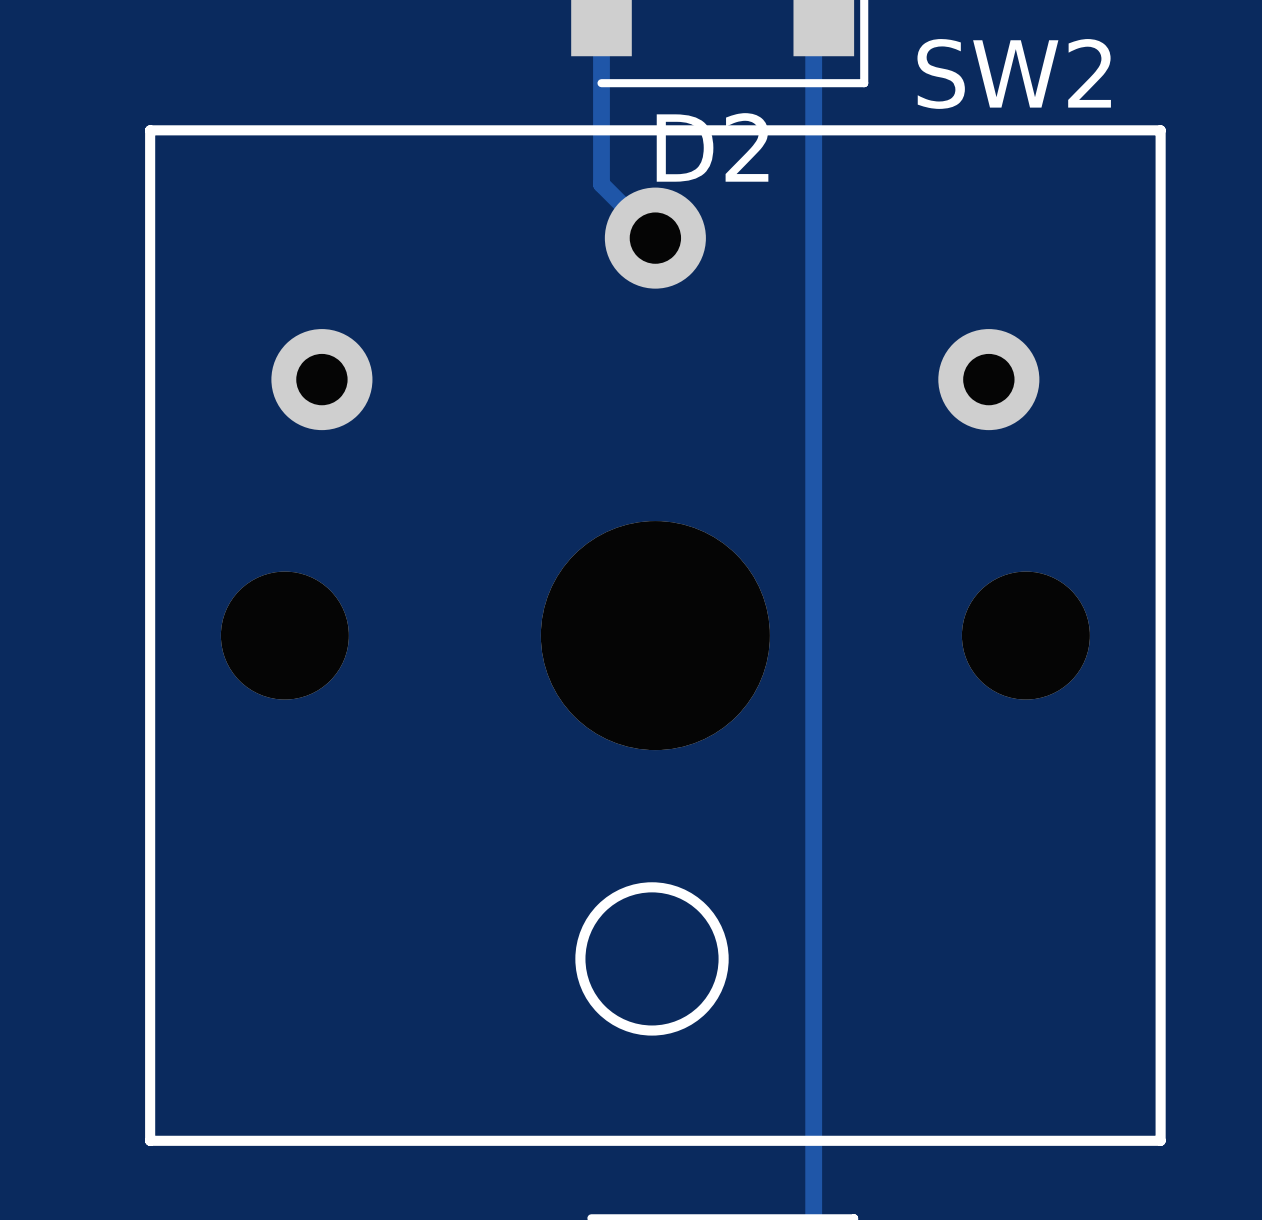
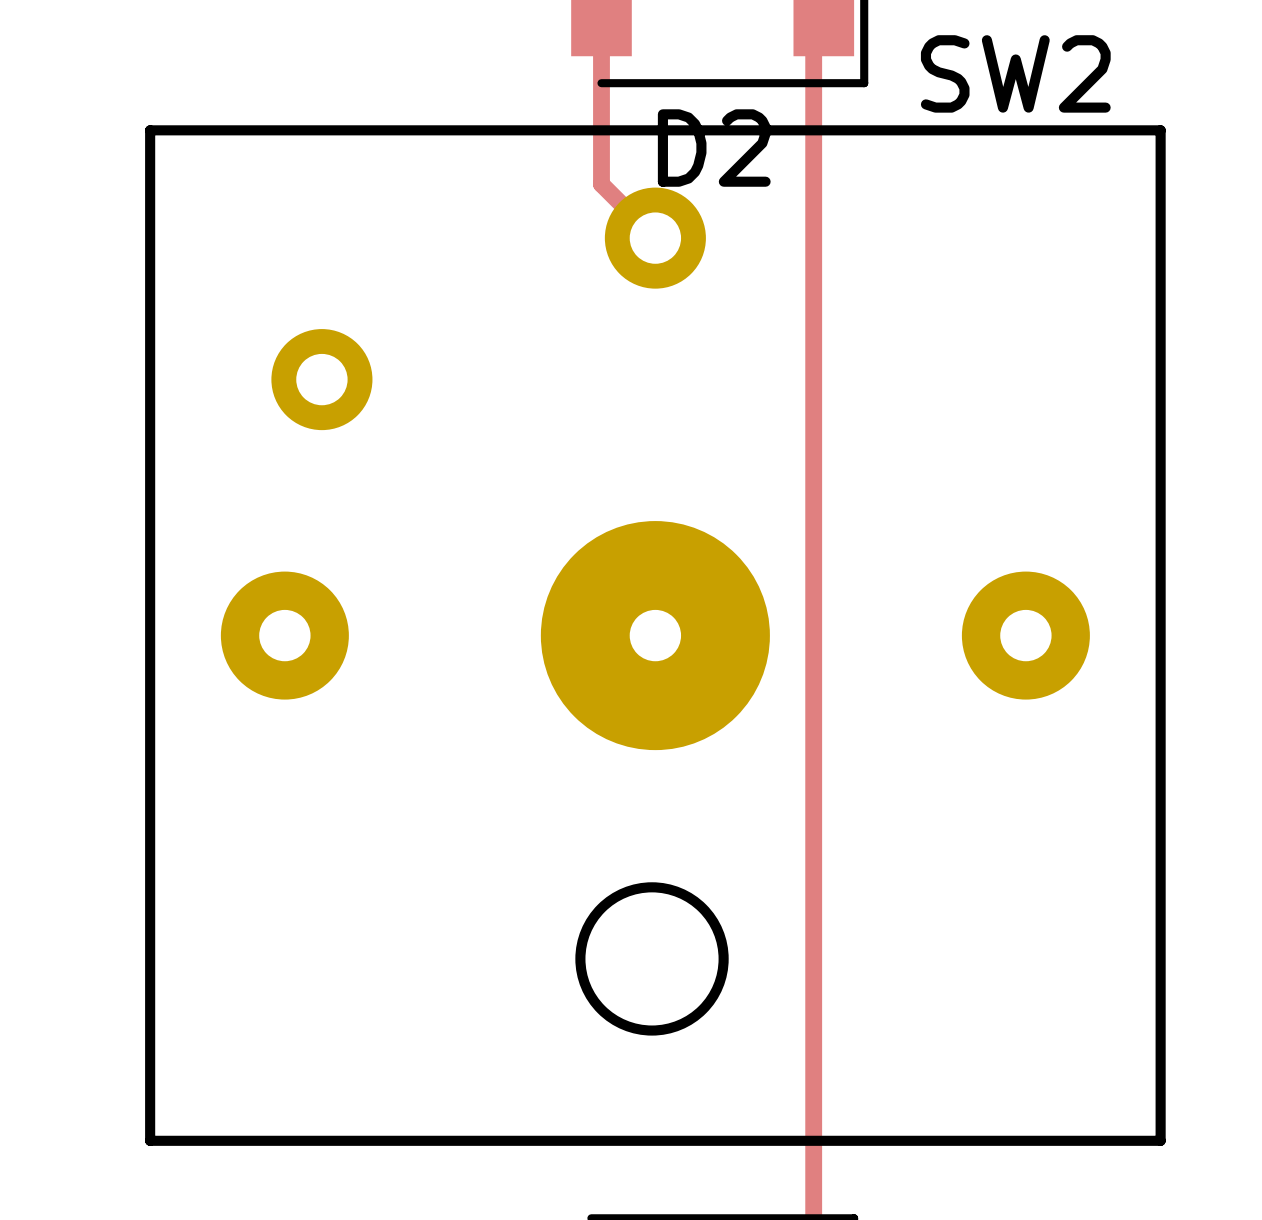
SW2 footprint: [145, 125, 1166, 1146] -> [145, 125, 1166, 1146]

